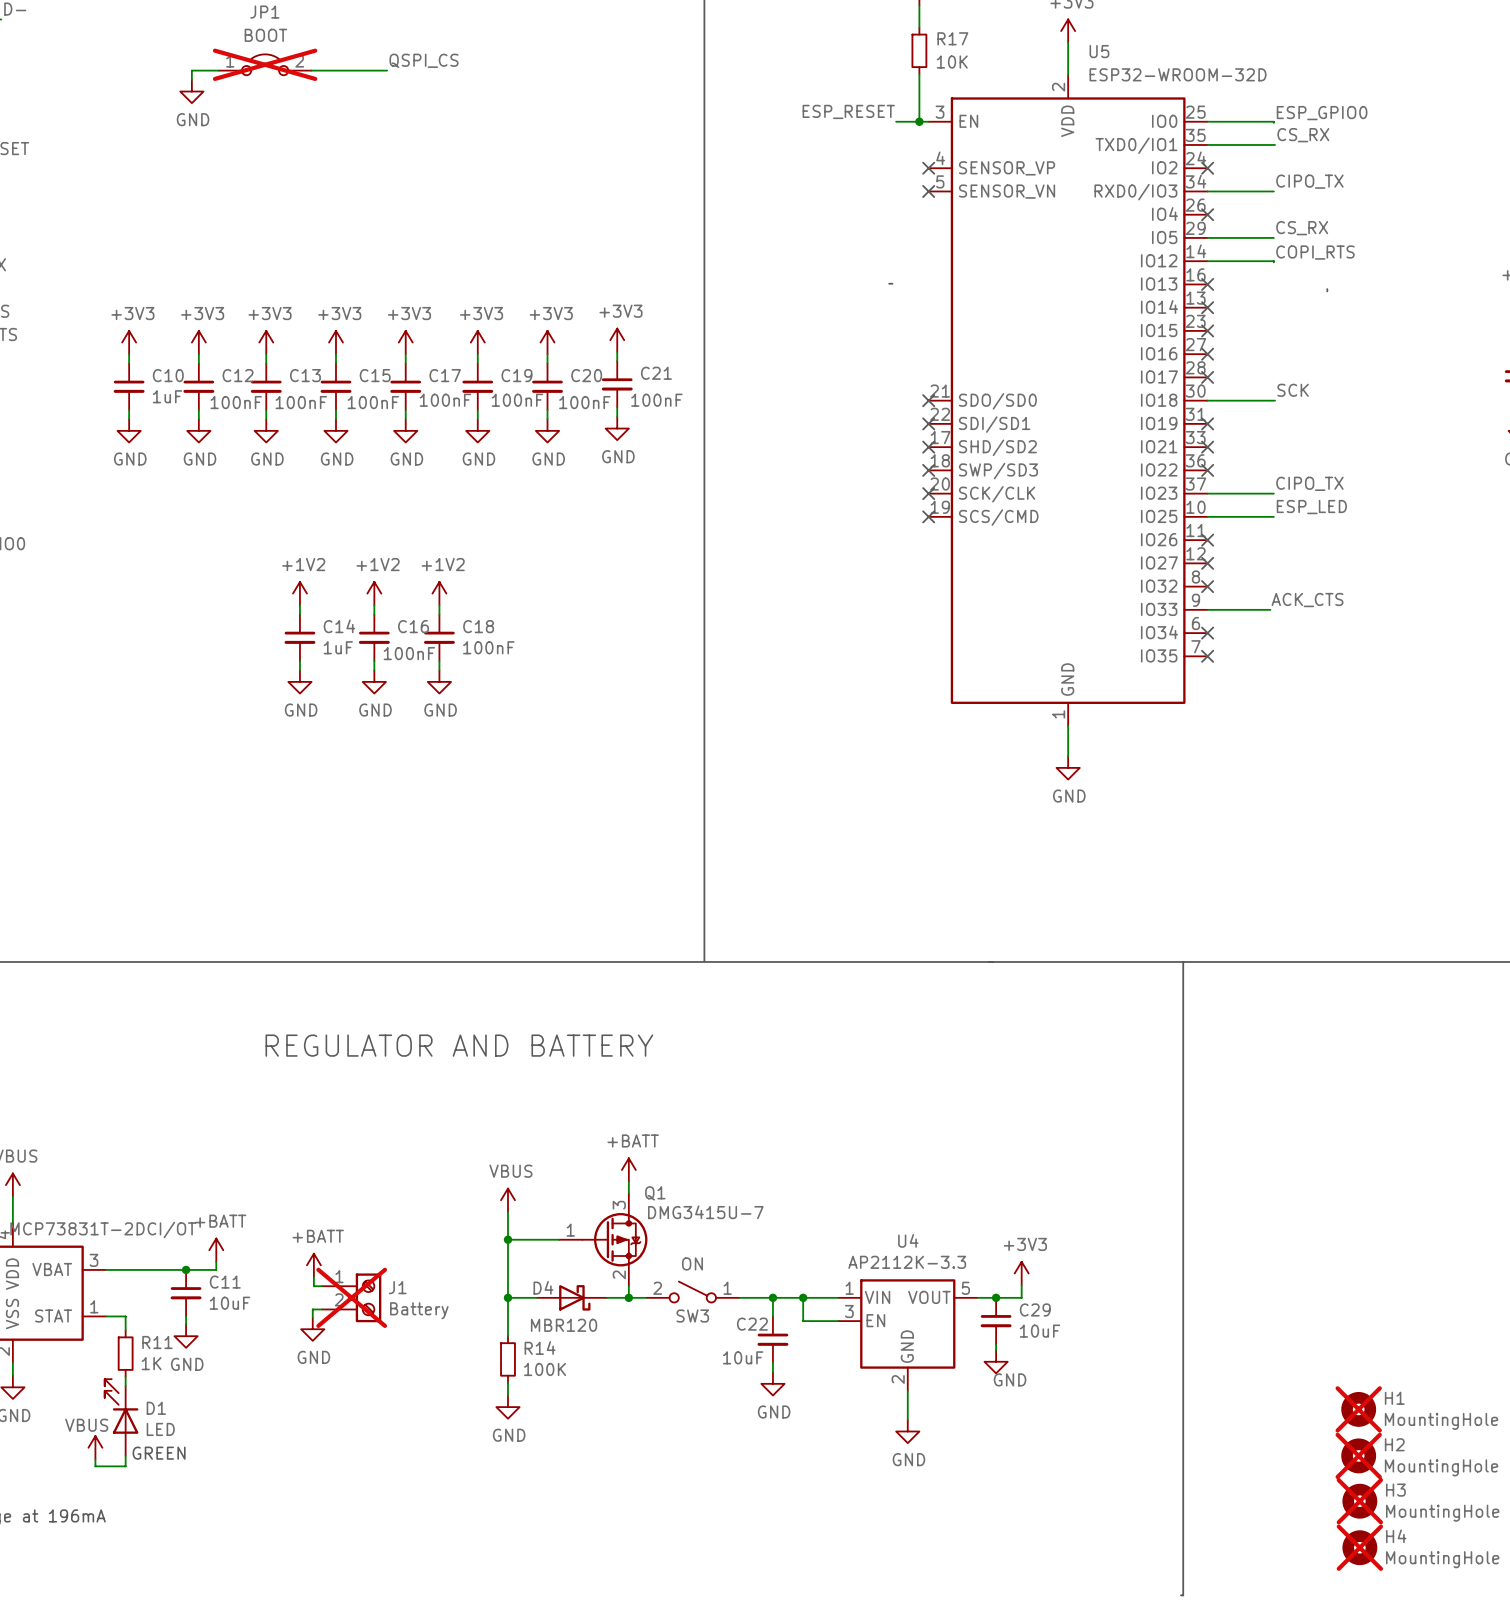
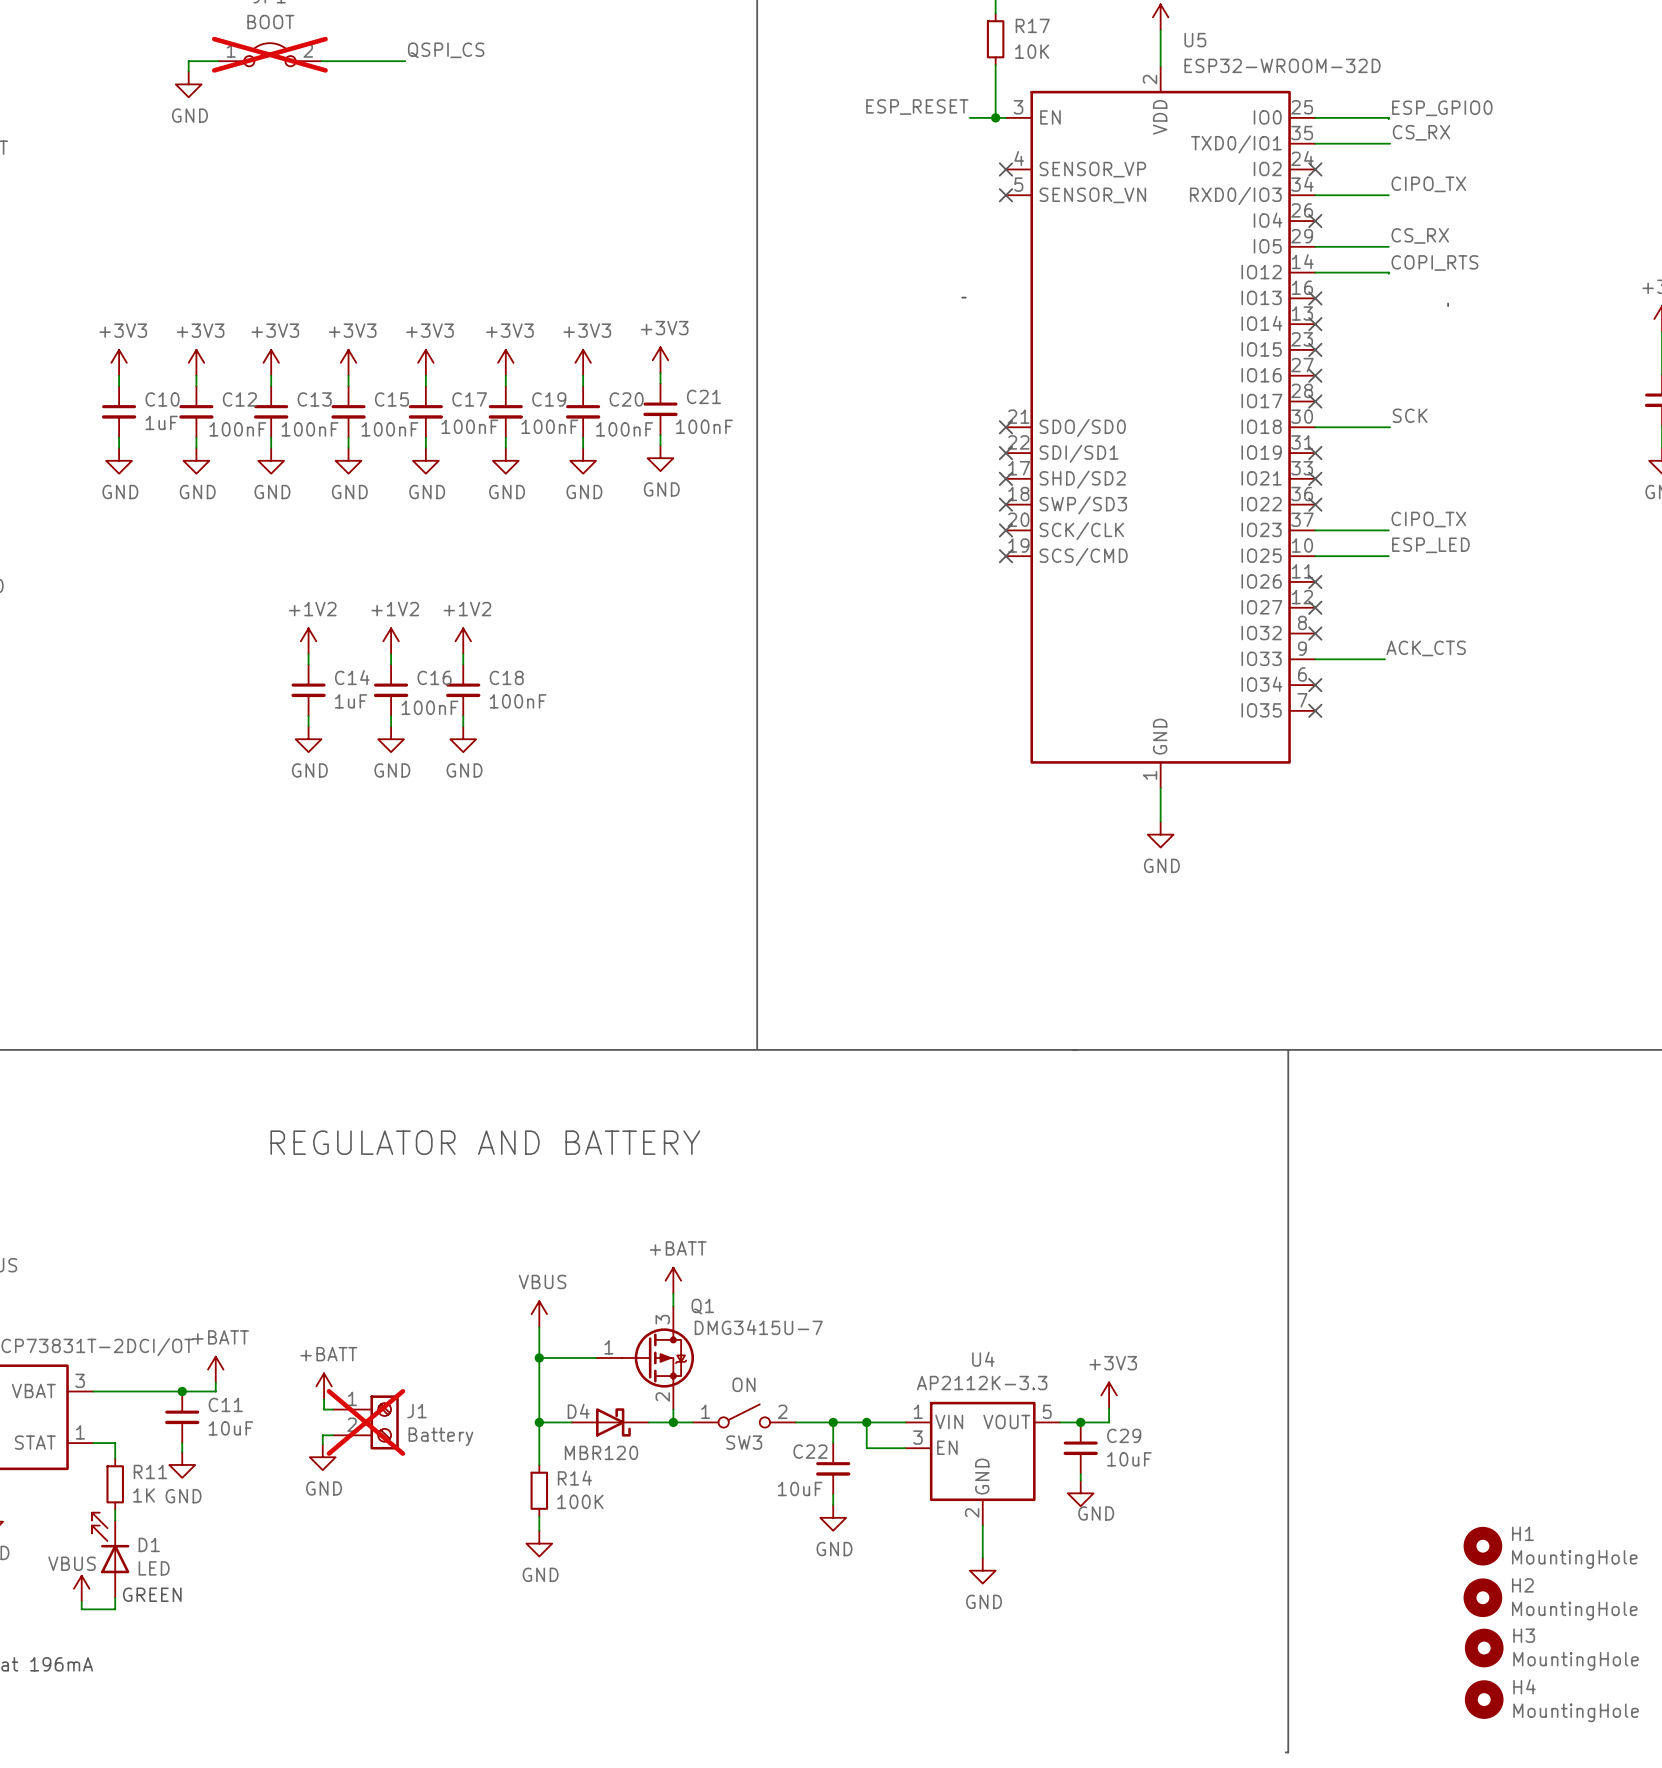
SW3 flip: as is (692, 1292) -> left-right (744, 1415)
H1 do-not-place cross: (1358, 1409) -> none
H2 do-not-place cross: (1358, 1455) -> none
H3 do-not-place cross: (1359, 1501) -> none
H4 do-not-place cross: (1359, 1547) -> none

